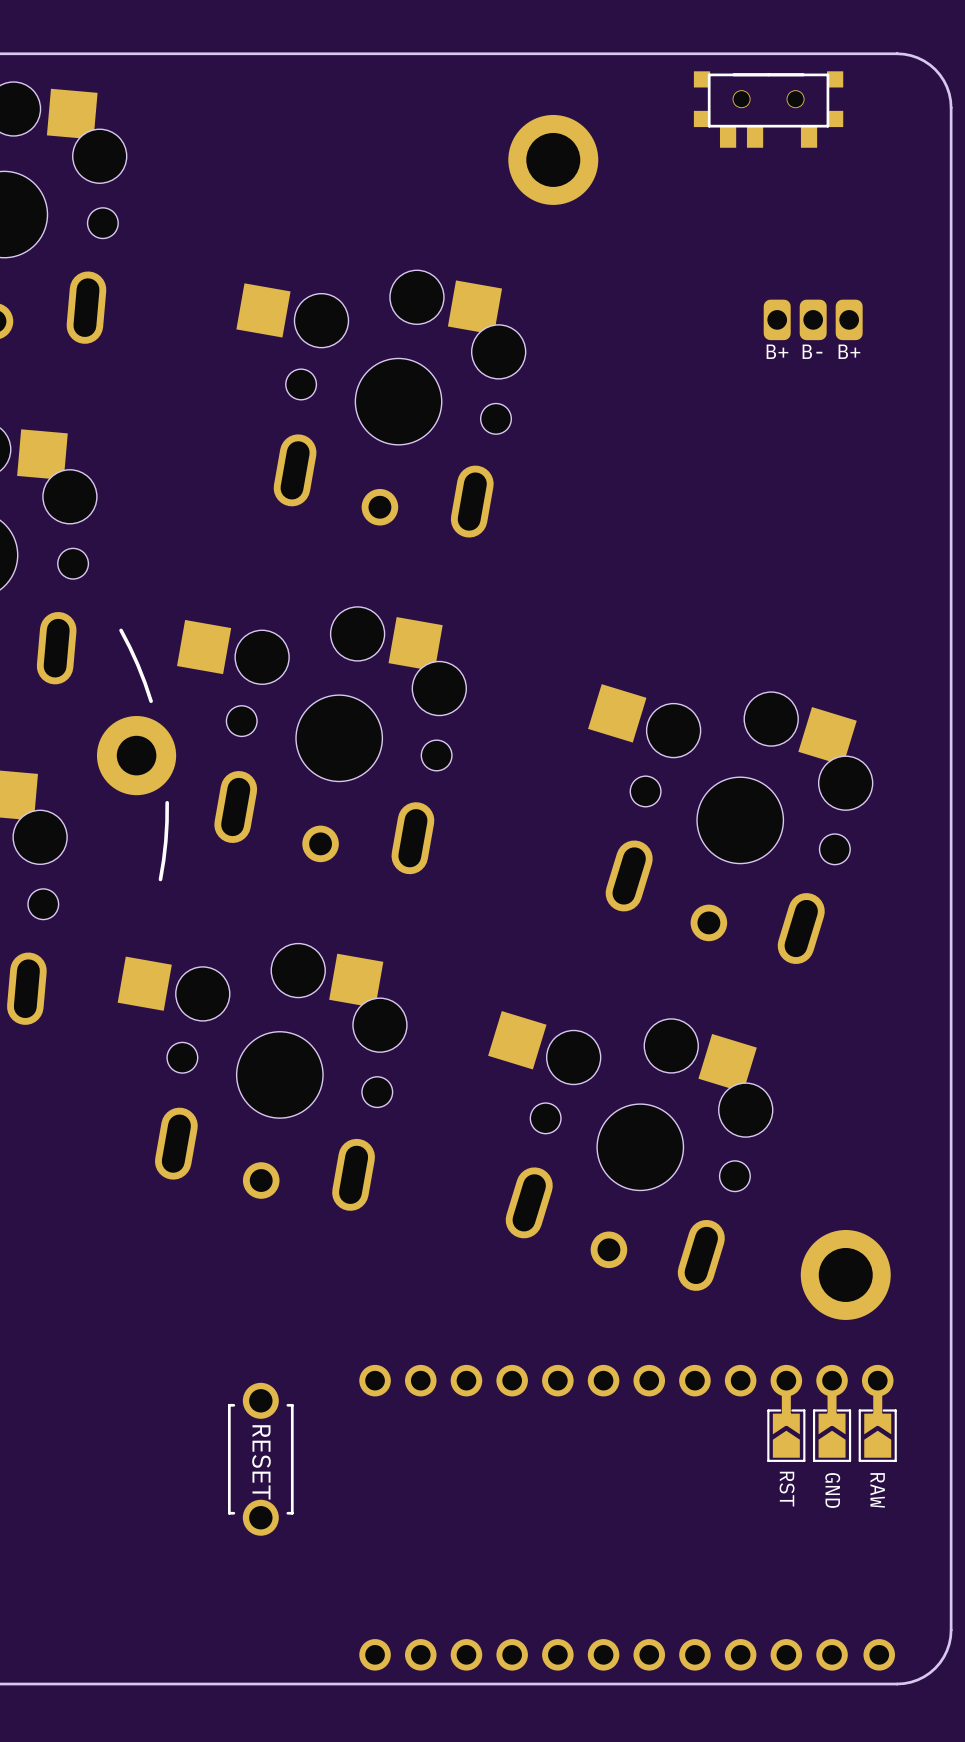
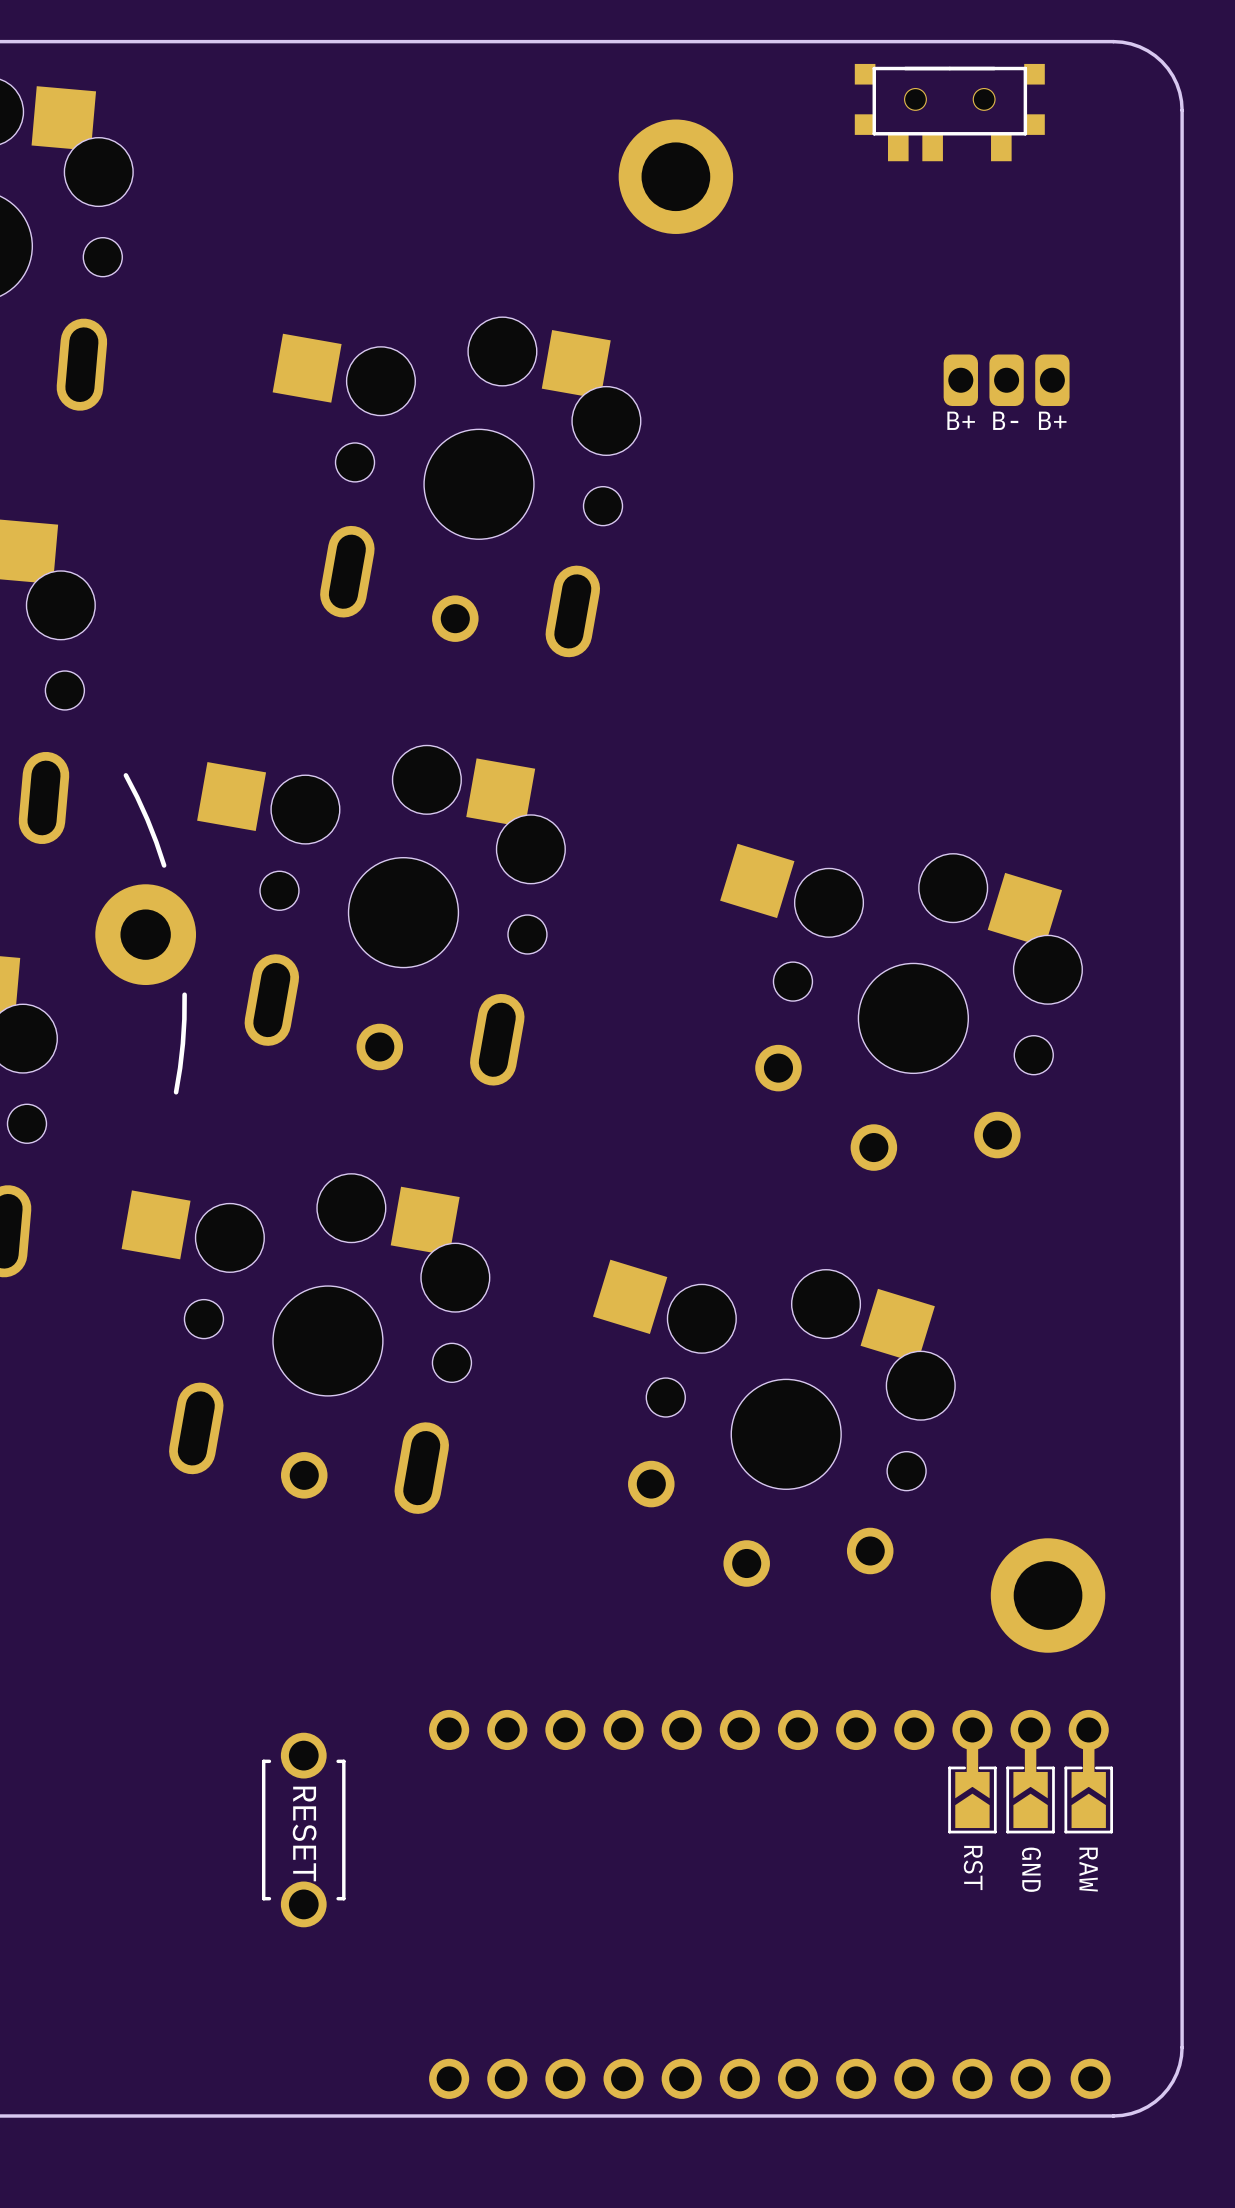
part footprint: [588, 684, 873, 965] -> [720, 843, 1083, 1171]
part footprint: [488, 1011, 773, 1291] -> [592, 1259, 956, 1587]

